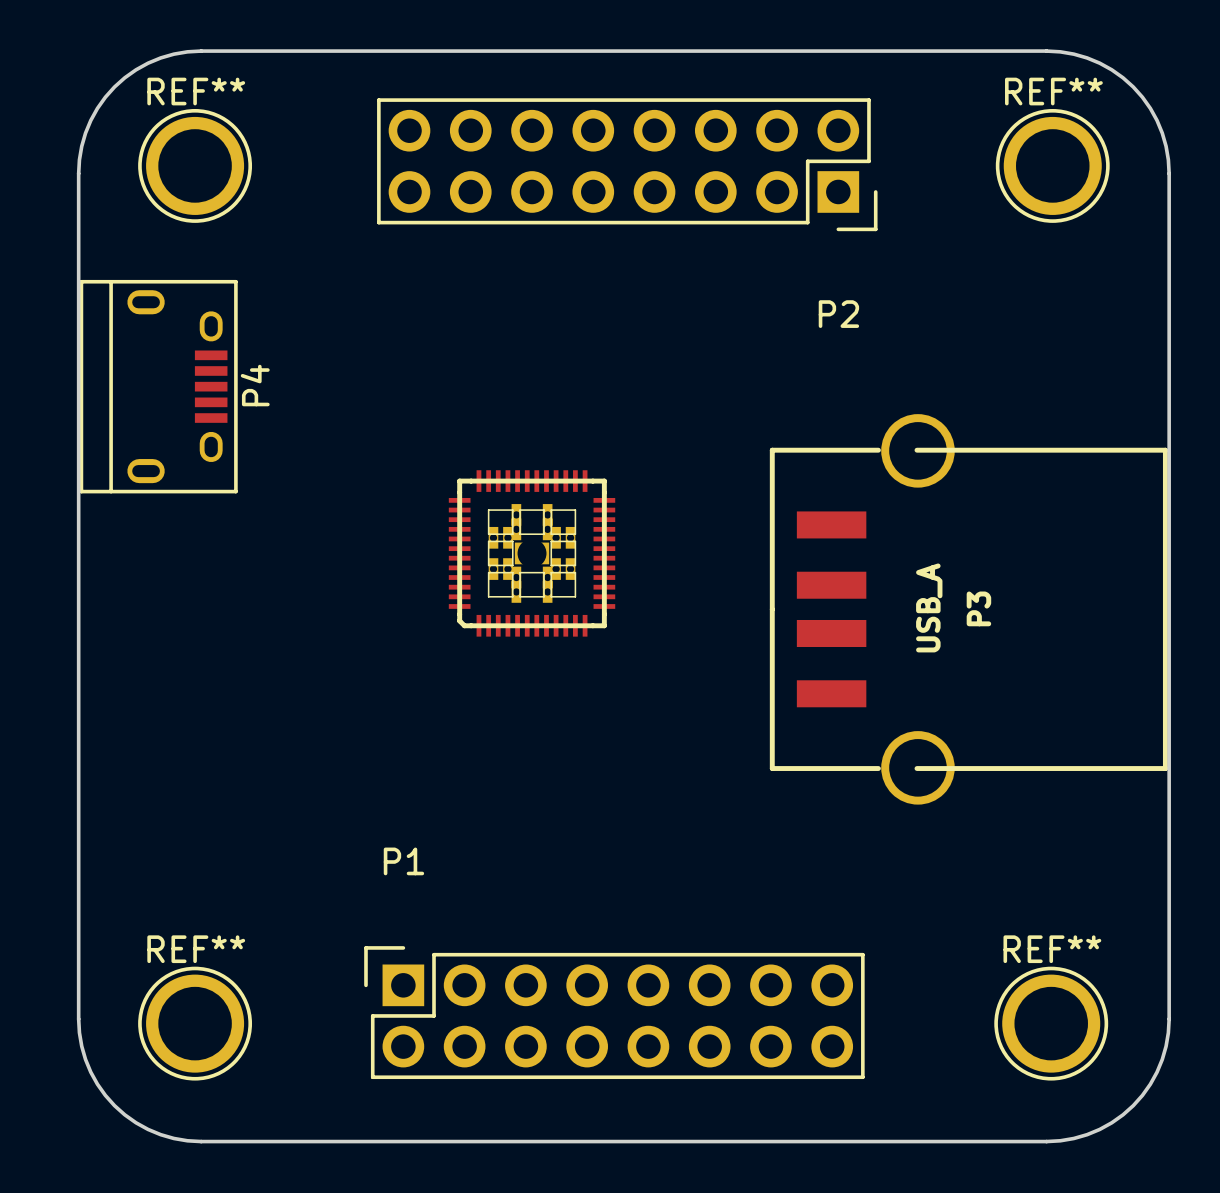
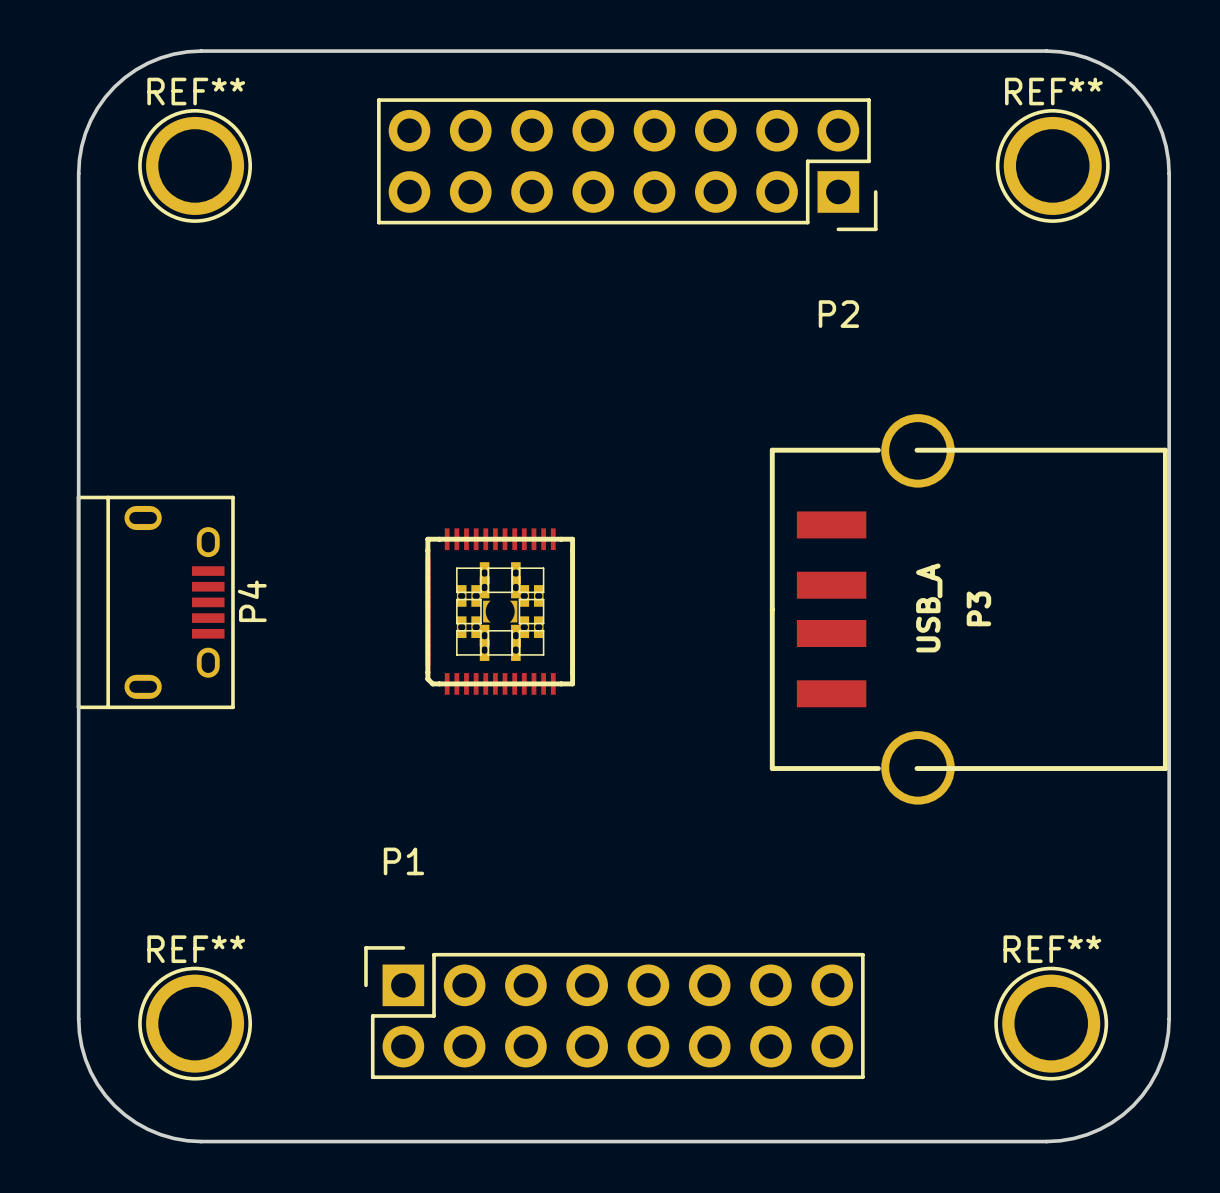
P4 position: (158, 386) -> (155, 602)
part: (532, 553) -> none
part: none -> (500, 611)

